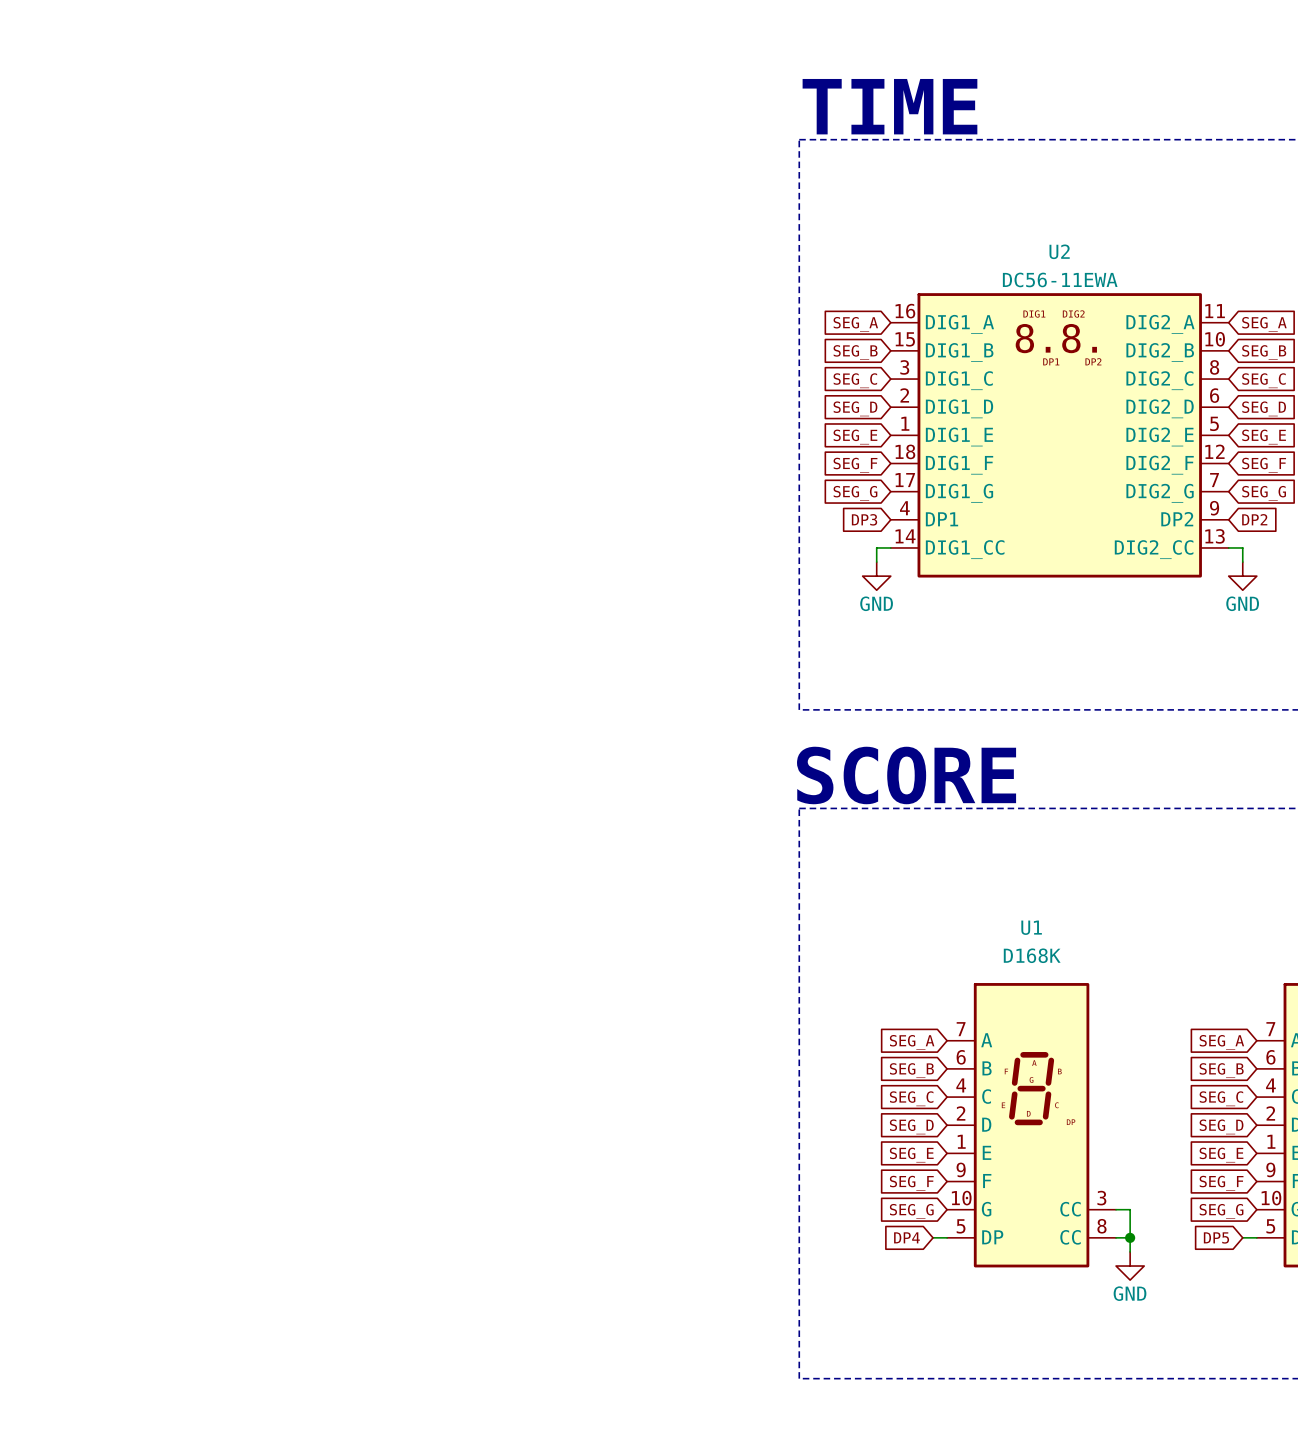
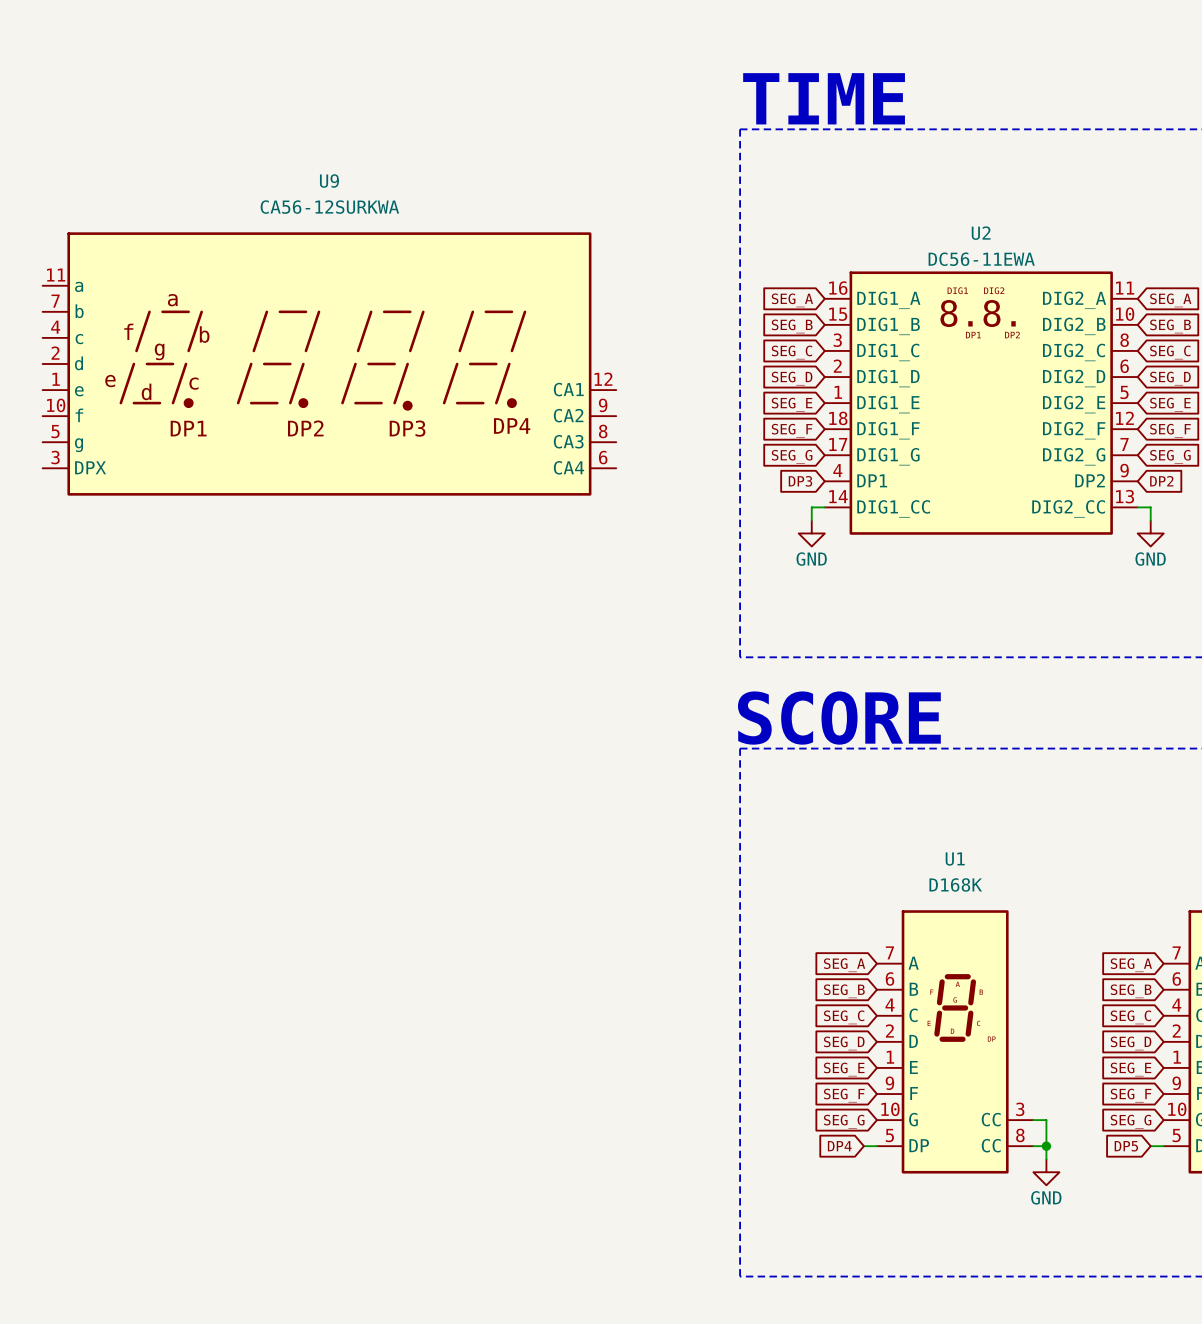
U9: none -> CA56-12SURKWA (329, 363)

